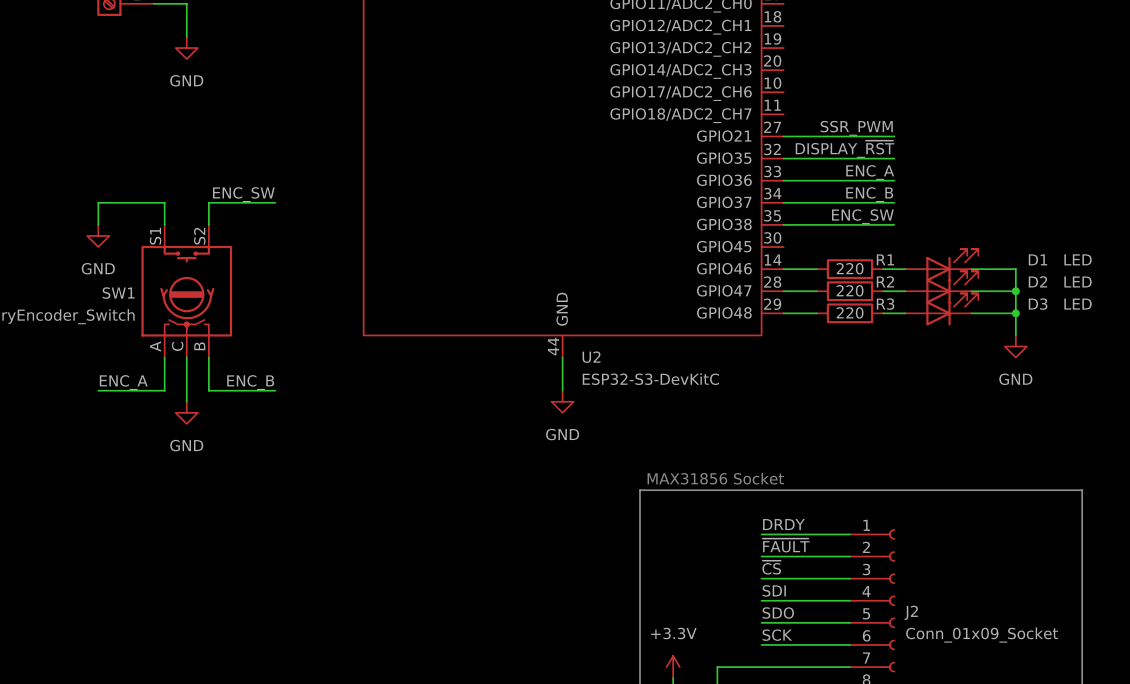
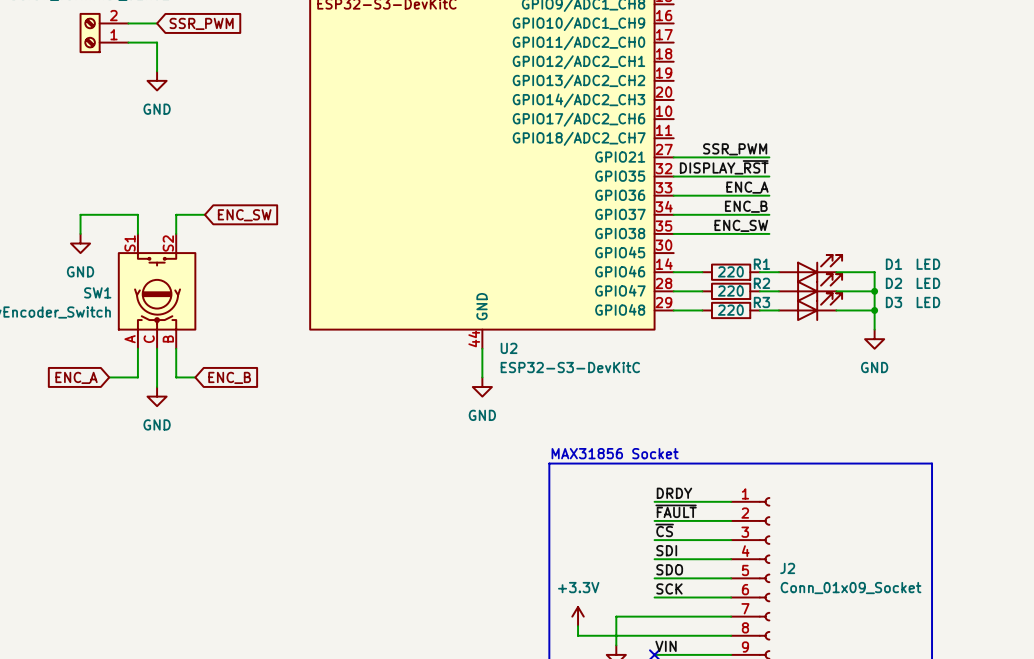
label: ENC_SW (243, 194) -> none
wire: (242, 202) (275, 202) -> none
global label: none -> ENC_SW (244, 215)
label: ENC_A (123, 382) -> none
label: ENC_B (250, 382) -> none
wire: (98, 390) (131, 390) -> none
wire: (230, 390) (275, 390) -> none
global label: none -> ENC_A (76, 377)
global label: none -> ENC_B (229, 377)

